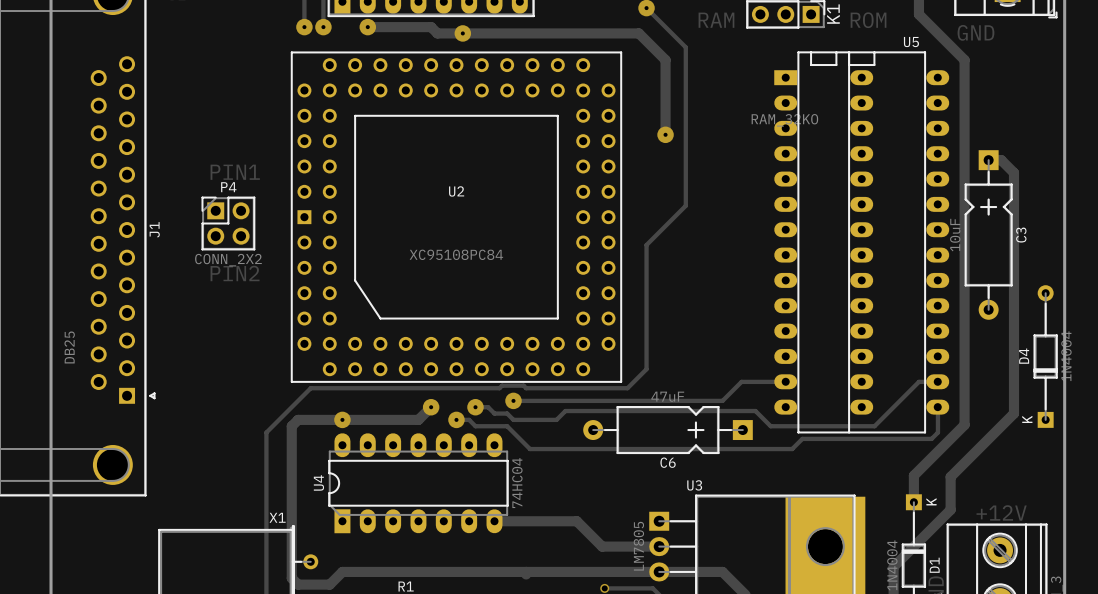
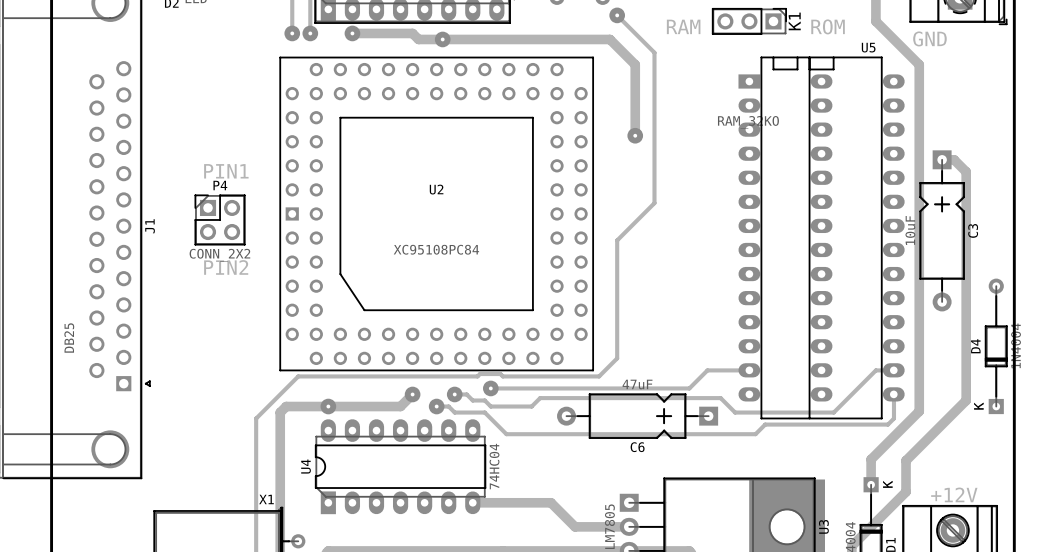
U3 name rotation: 0° (694, 485) -> 90° counterclockwise (823, 526)
U3 name position: U3 (694, 485) -> U3 (823, 526)

